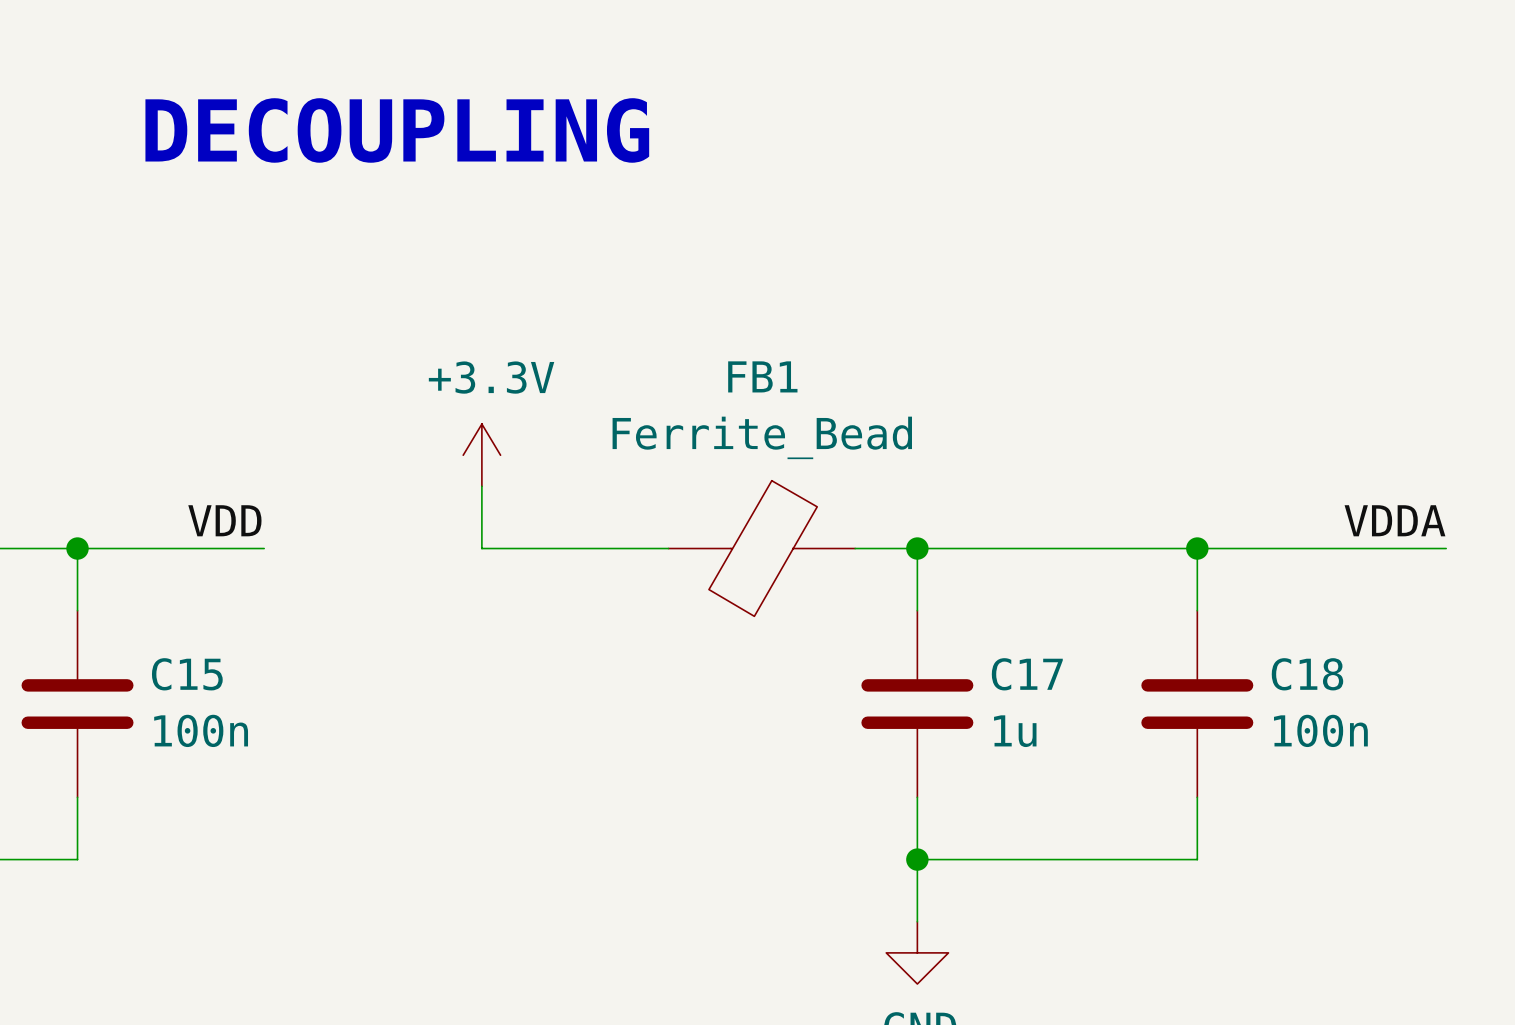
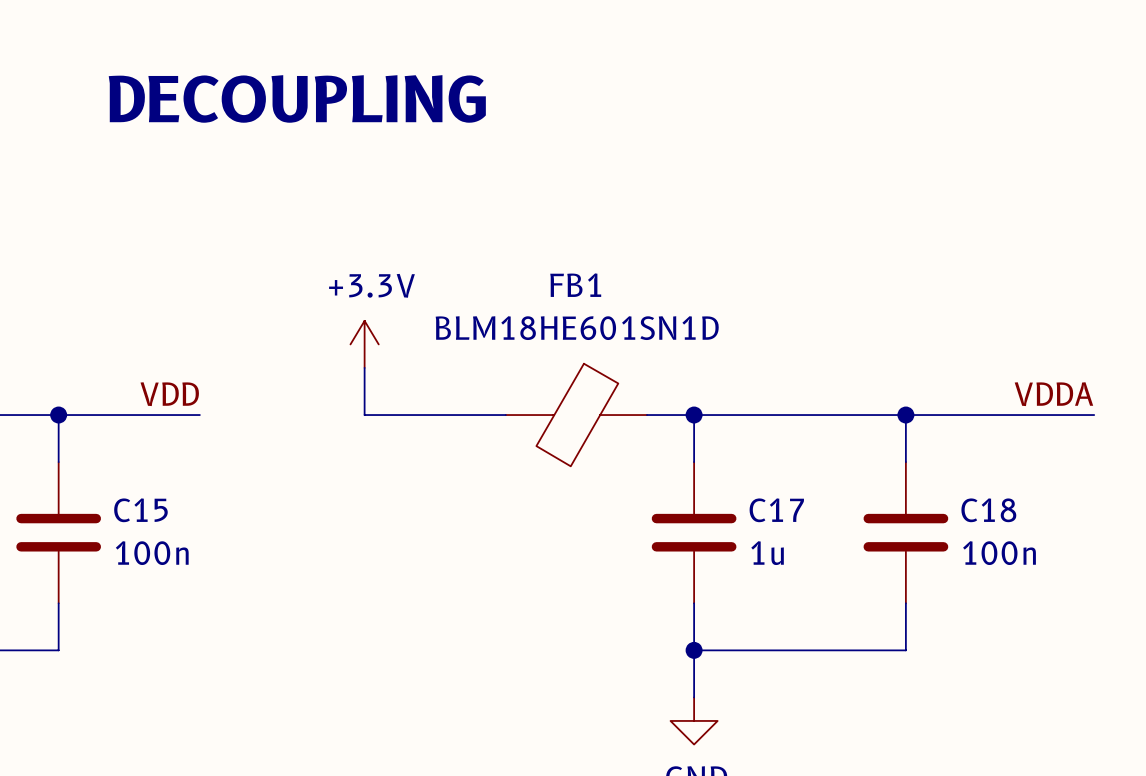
FB1 value: Ferrite_Bead (762, 437) -> BLM18HE601SN1D (577, 328)

